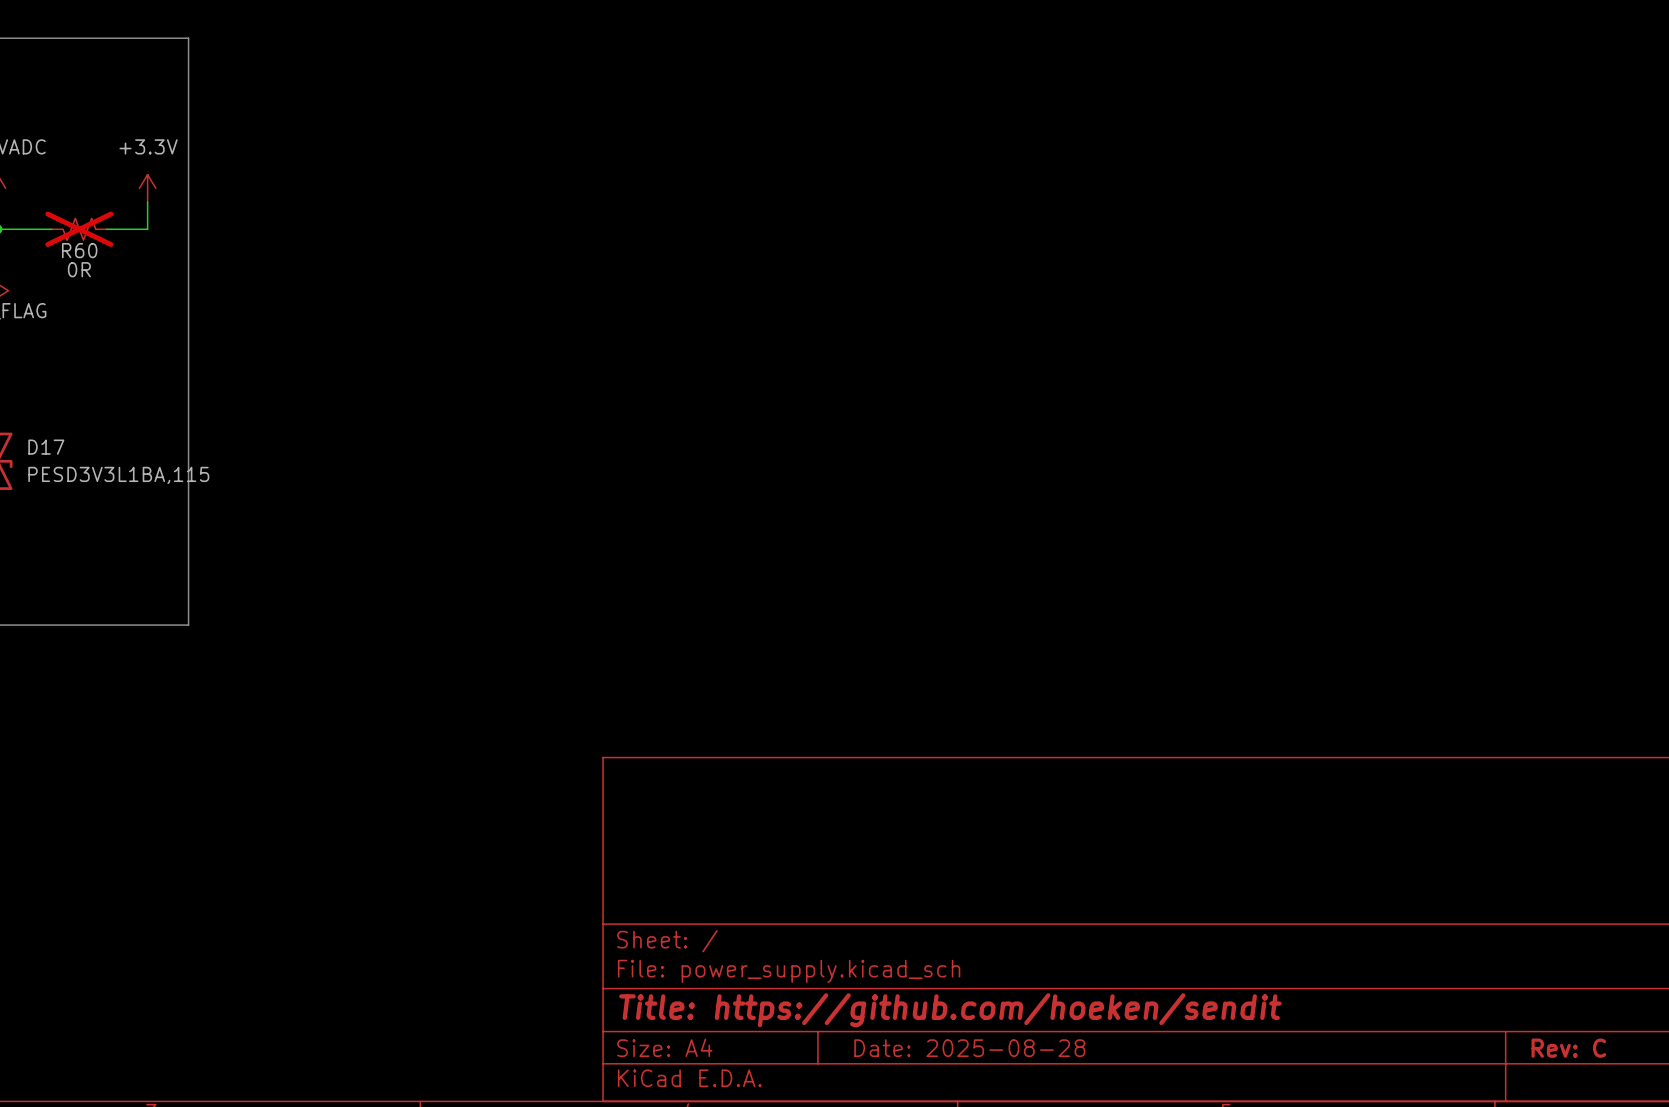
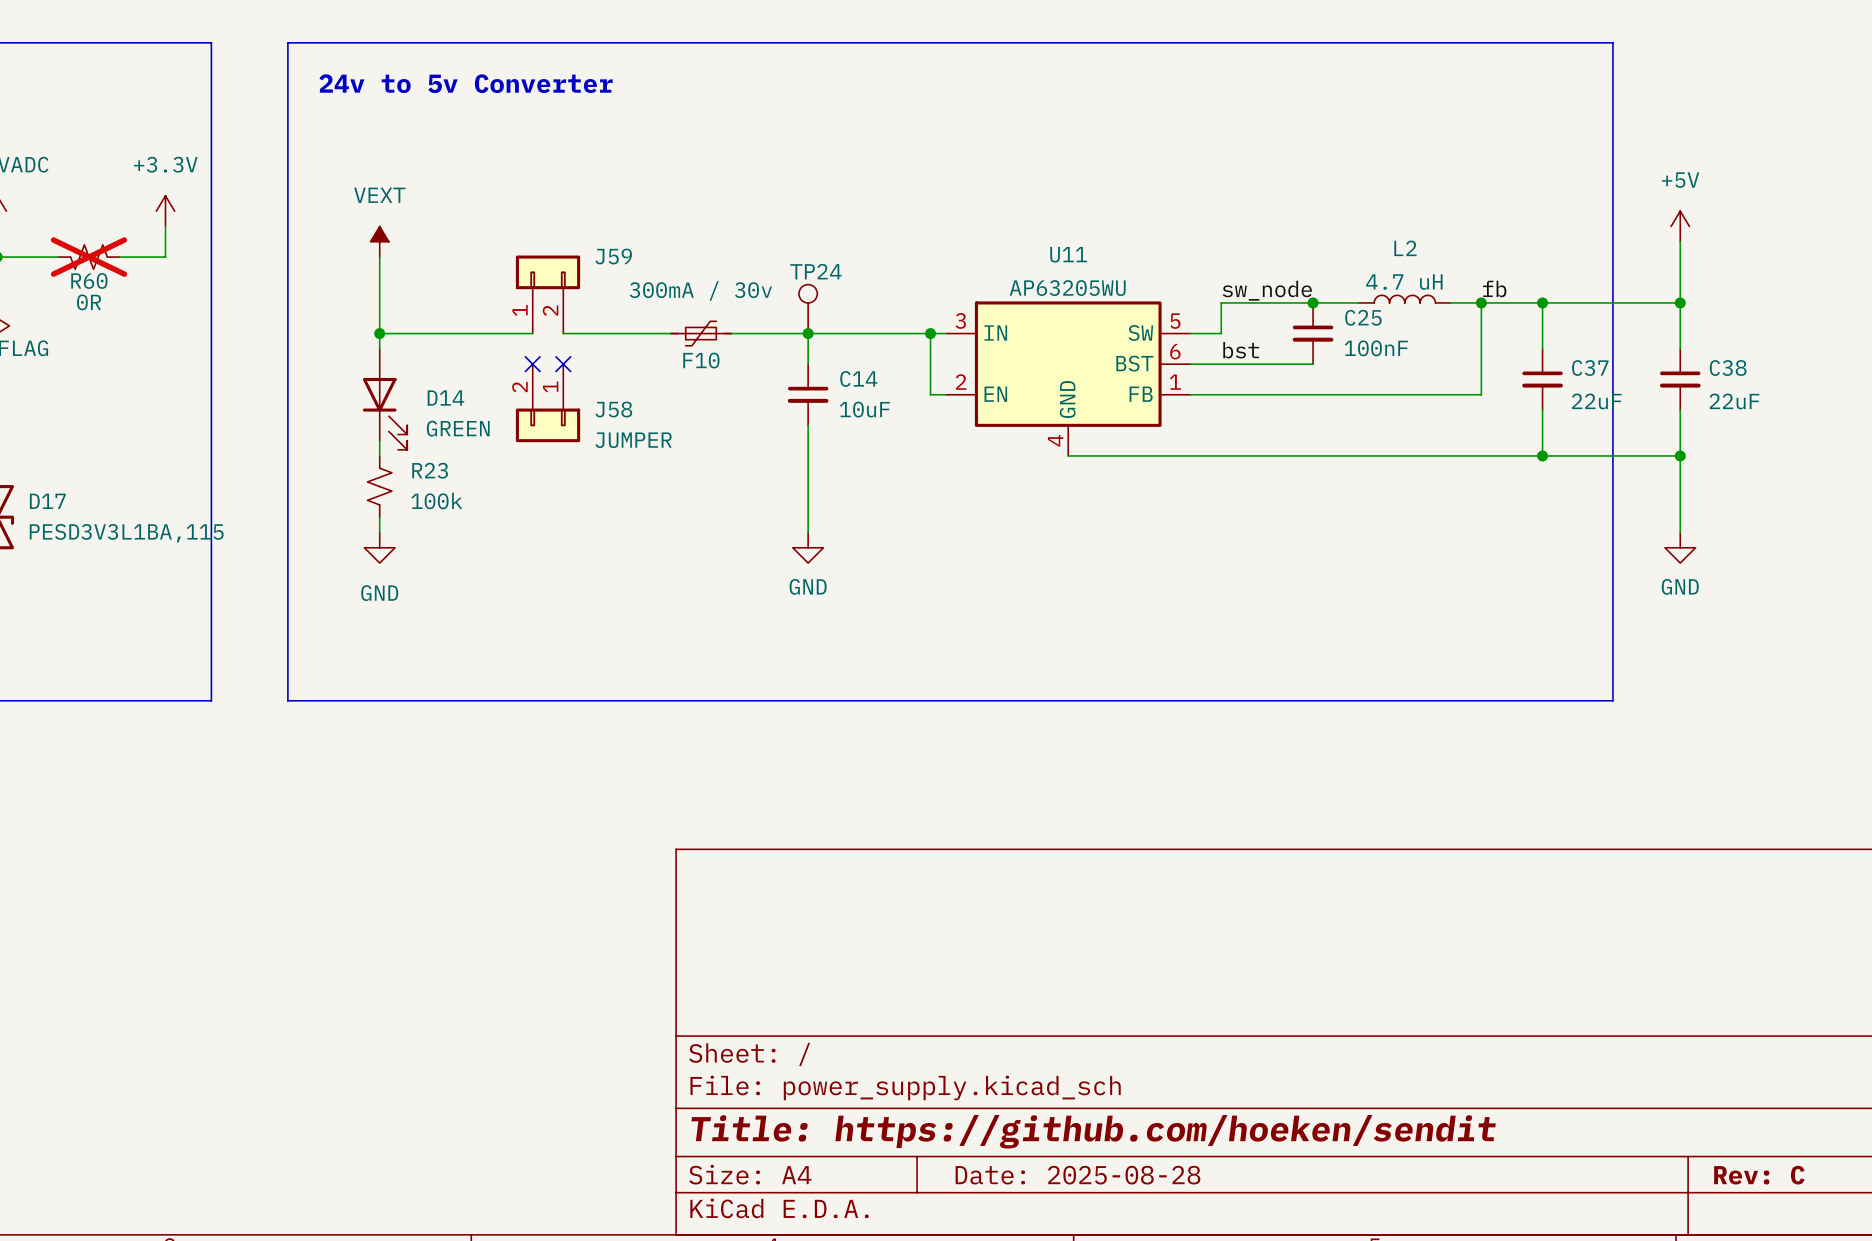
line: none -> (287, 42) (1612, 42) (1612, 700) (287, 700) (287, 42)
text: none -> 24v to 5v Converter (466, 83)
power symbol: none -> +5V (1680, 226)
power symbol: none -> VEXT (379, 241)
wire: none -> (1680, 241) (1680, 348)
wire: none -> (379, 257) (379, 348)
label: none -> sw_node (1267, 290)
label: none -> fb (1494, 288)
J59: none -> (548, 294)
L2: none -> 4.7 uH (1404, 299)
junction: none -> (1313, 302)
wire: none -> (1358, 302) (1221, 302) (1221, 333) (1190, 333)
wire: none -> (1450, 302) (1680, 302)
wire: none -> (1481, 302) (1481, 394) (1190, 394)
junction: none -> (1481, 302)
wire: none -> (1542, 302) (1542, 348)
junction: none -> (1542, 302)
junction: none -> (1680, 302)
TP24: none -> (808, 309)
wire: none -> (379, 333) (532, 333)
junction: none -> (379, 333)
wire: none -> (563, 333) (670, 333)
F10: none -> 300mA / 30v (701, 333)
wire: none -> (731, 333) (945, 333)
wire: none -> (808, 333) (808, 364)
junction: none -> (808, 333)
wire: none -> (930, 333) (930, 394) (945, 394)
junction: none -> (930, 333)
C25: none -> 100nF (1313, 333)
label: none -> bst (1241, 350)
no-connect mark: none -> (532, 364)
no-connect mark: none -> (563, 364)
wire: none -> (1190, 364) (1313, 364)
U11: none -> AP63205WU (1068, 378)
C37: none -> 22uF (1542, 379)
C38: none -> 22uF (1680, 379)
C14: none -> 10uF (808, 394)
D14: none -> GREEN (385, 399)
J58: none -> JUMPER (548, 403)
wire: none -> (1542, 410) (1542, 455)
wire: none -> (1680, 410) (1680, 532)
wire: none -> (808, 425) (808, 532)
wire: none -> (379, 440) (379, 455)
wire: none -> (1068, 455) (1680, 455)
junction: none -> (1542, 455)
junction: none -> (1680, 455)
R23: none -> 100k (379, 486)
wire: none -> (379, 517) (379, 532)
power symbol: none -> GND (379, 547)
power symbol: none -> GND (808, 547)
power symbol: none -> GND (1680, 547)

